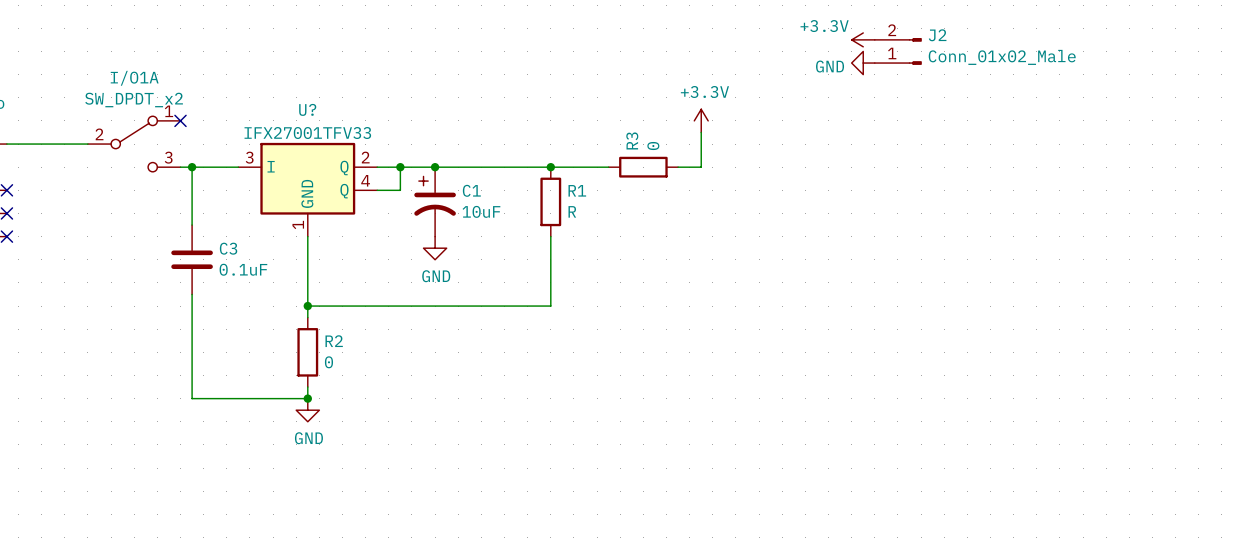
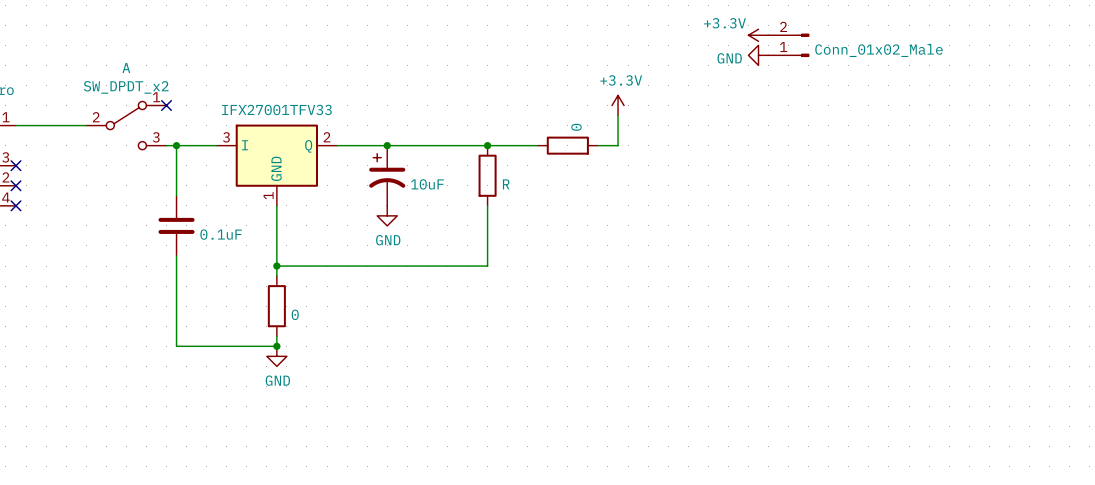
J2 name: J2 (937, 35) -> none
I/O1A name: I/O1A (134, 78) -> A (126, 68)
R3 name: R3 (632, 140) -> none
wire: (400, 167) (400, 190) (377, 190) -> none
junction: (400, 167) -> none
U?: IFX27001TFV33 (307, 189) -> none
part: none -> IFX27001TFV33 (276, 165)
C1 name: C1 (471, 190) -> none
R1 name: R1 (577, 190) -> none
C3 name: C3 (228, 248) -> none
R2 name: R2 (334, 341) -> none

